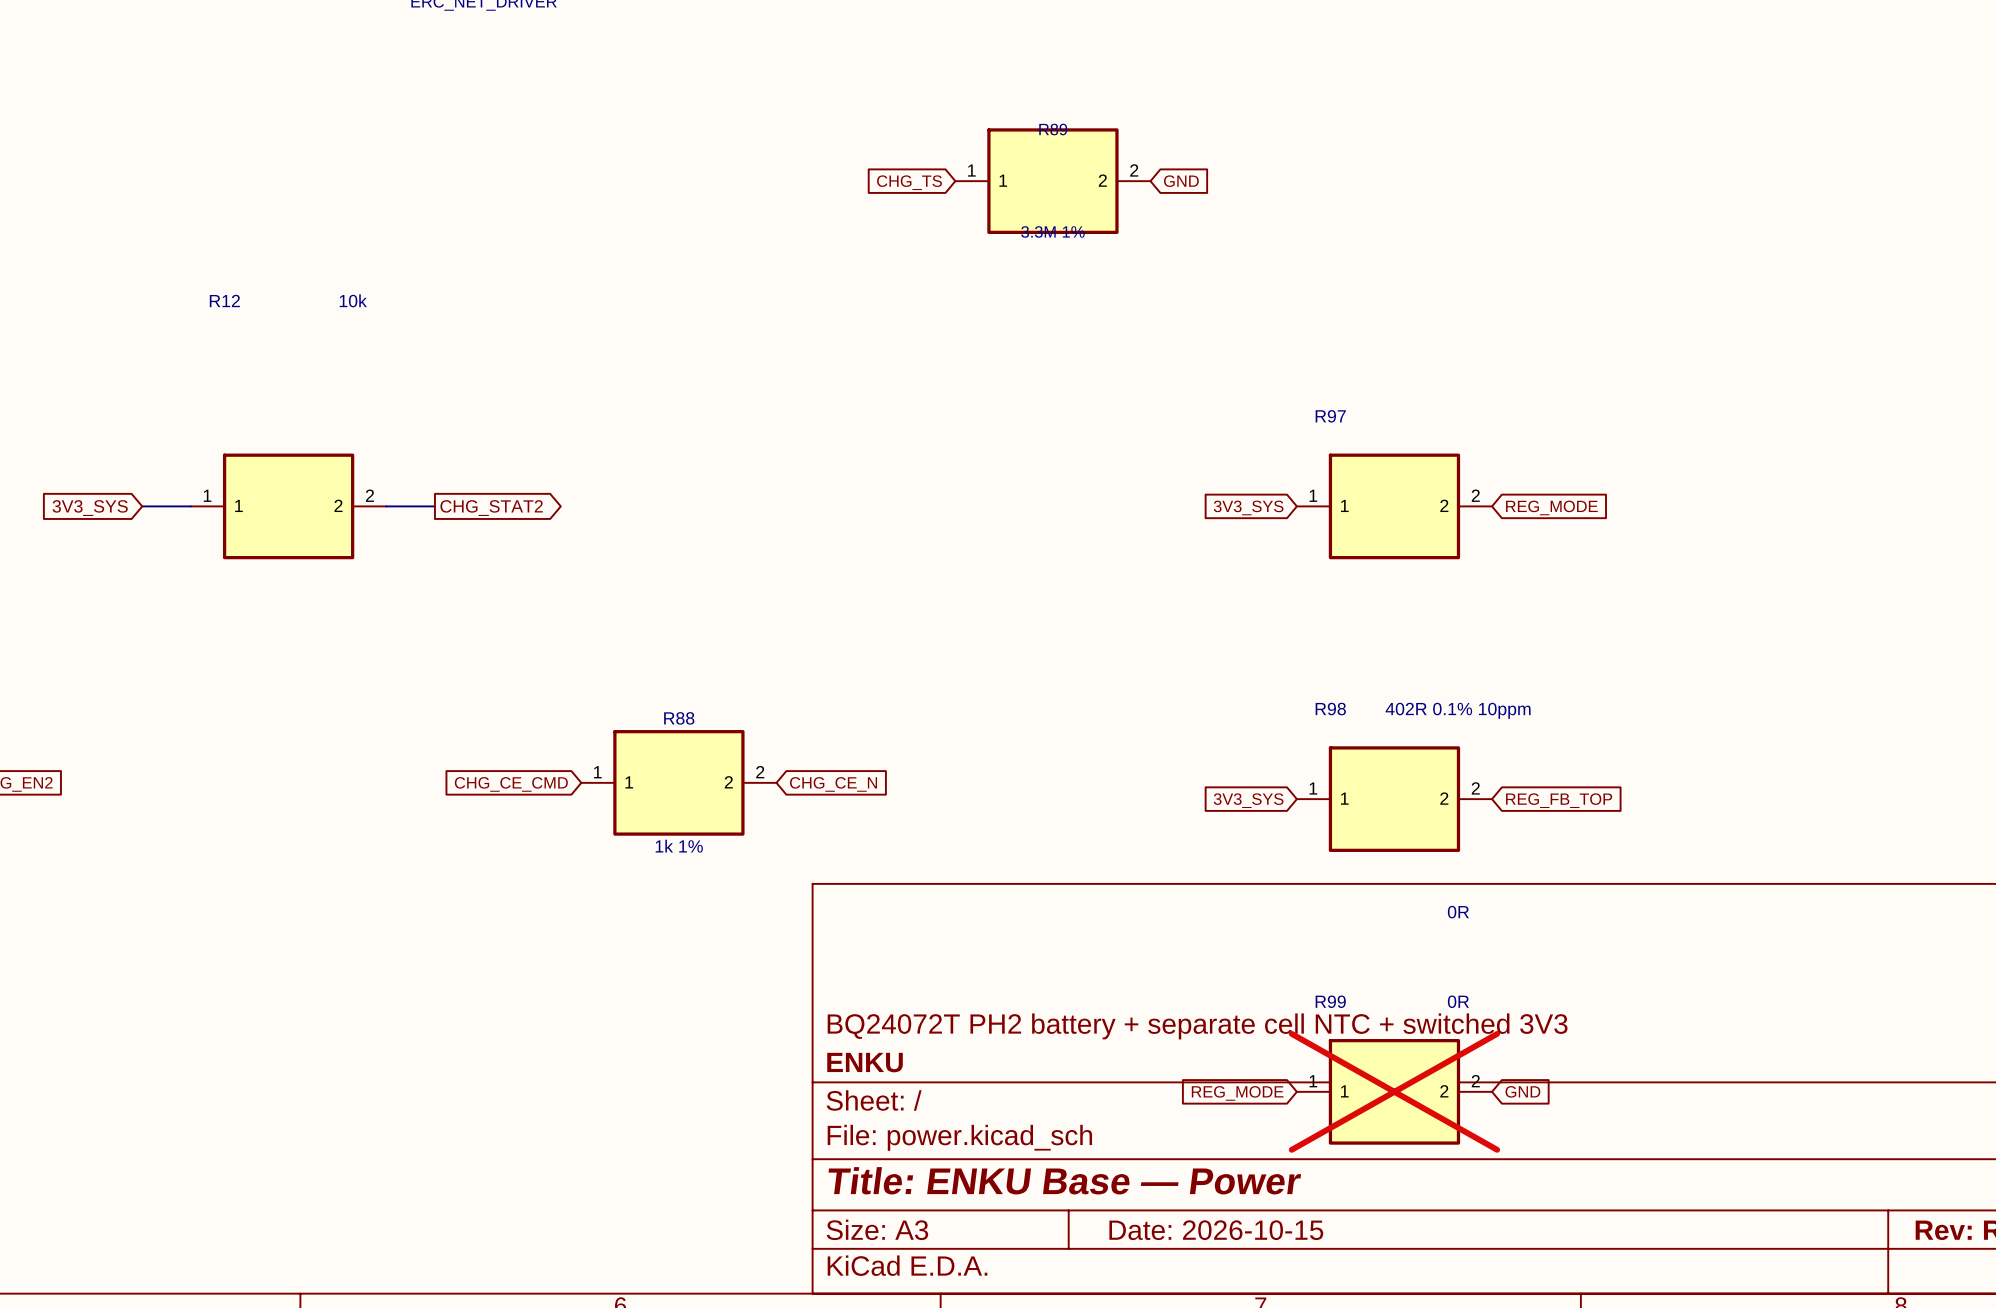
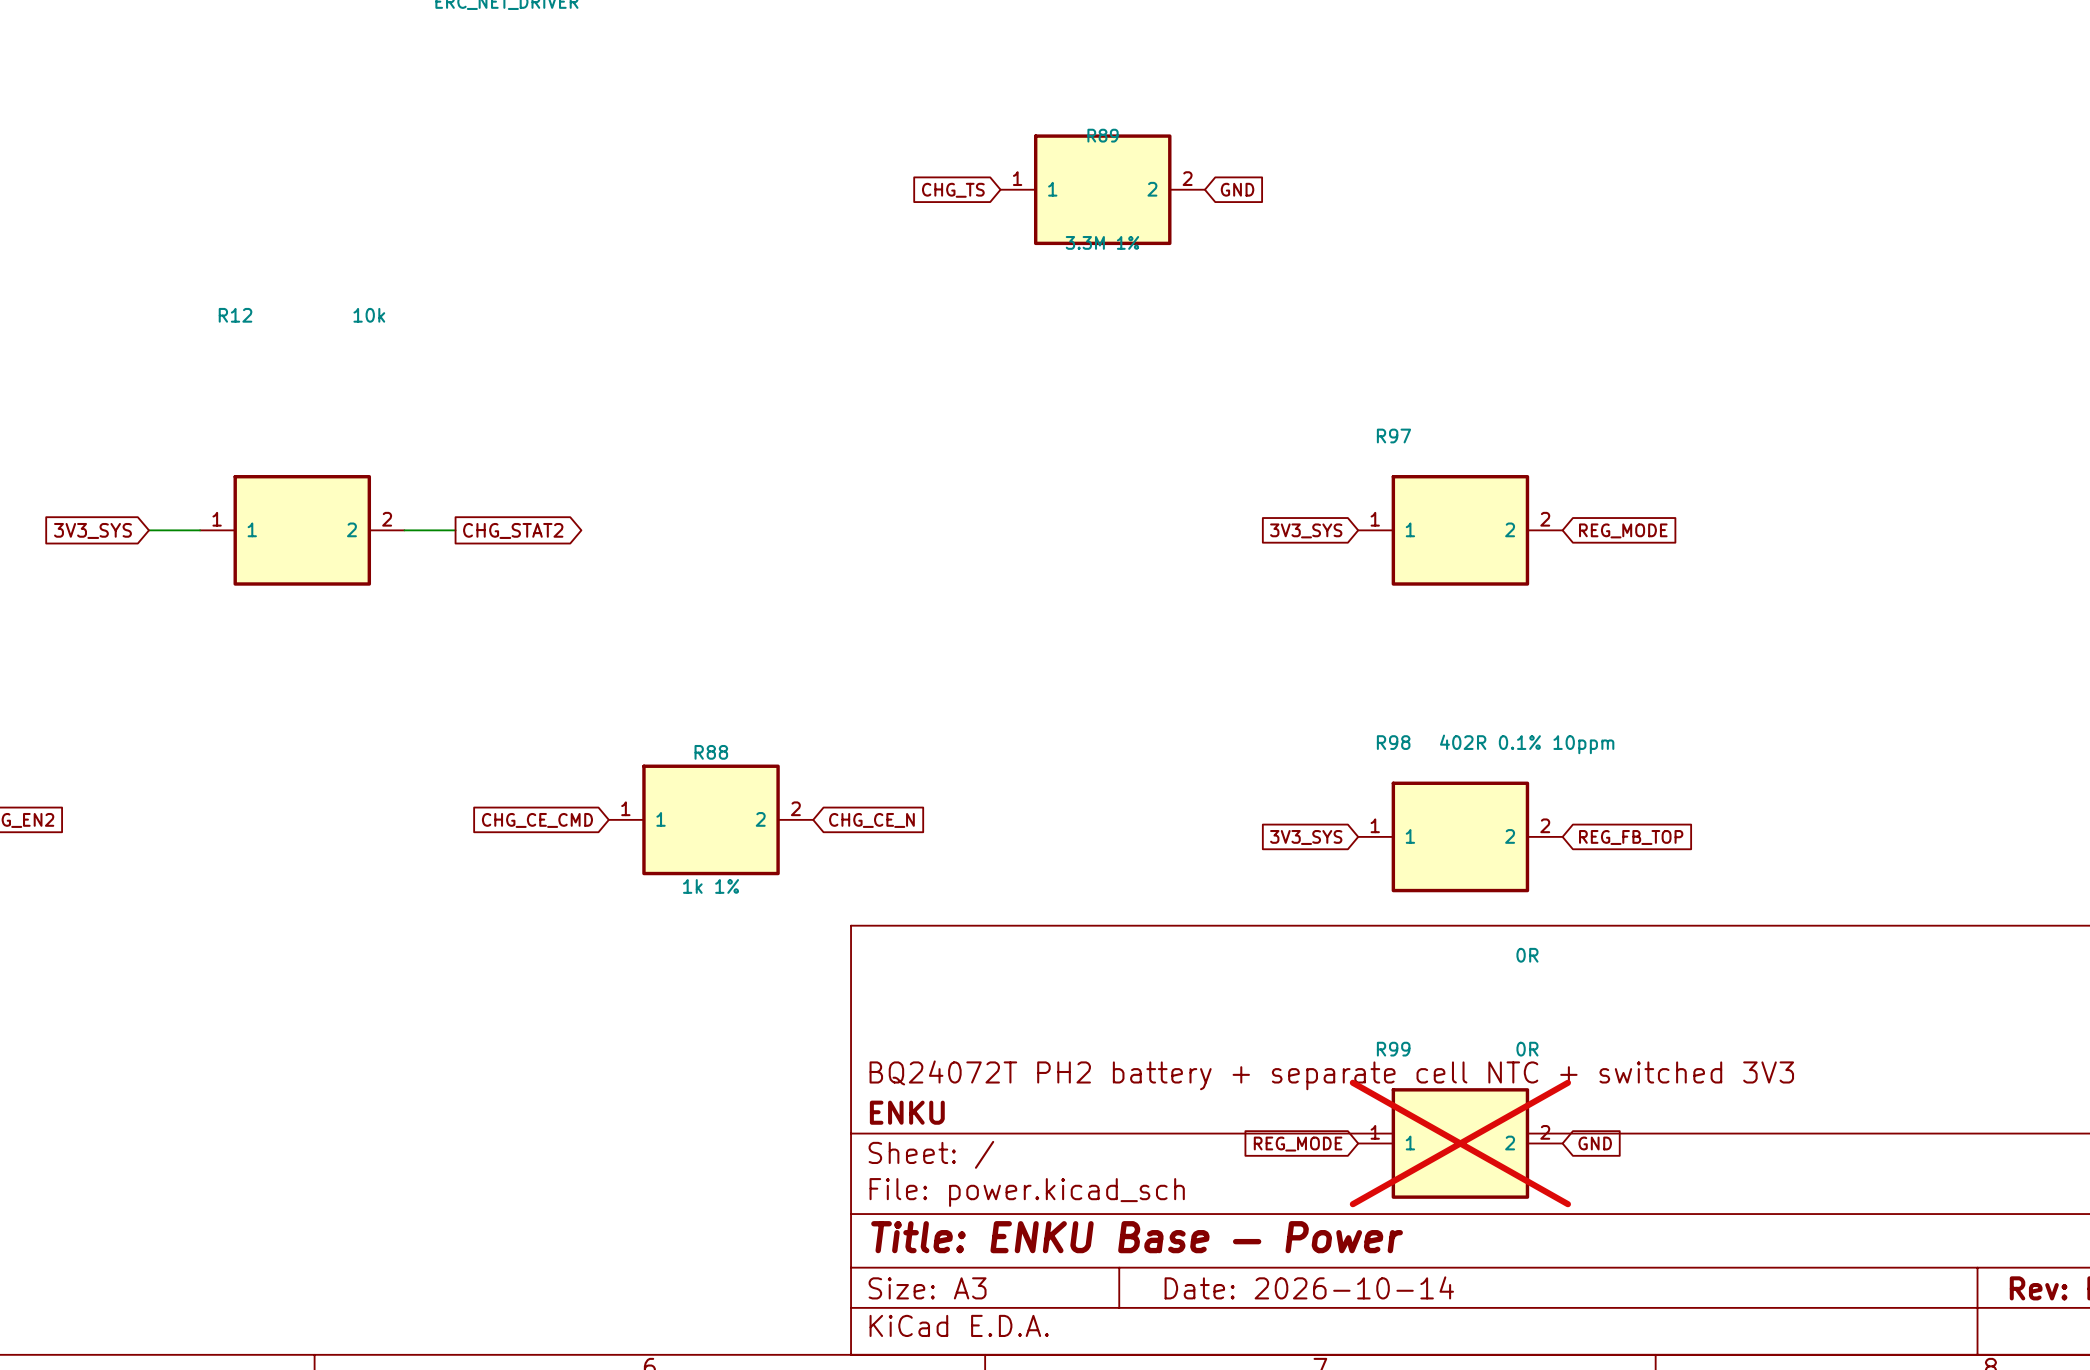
title block: Date: 2026-10-15 (1216, 1230) -> Date: 2026-10-14 (1309, 1287)

